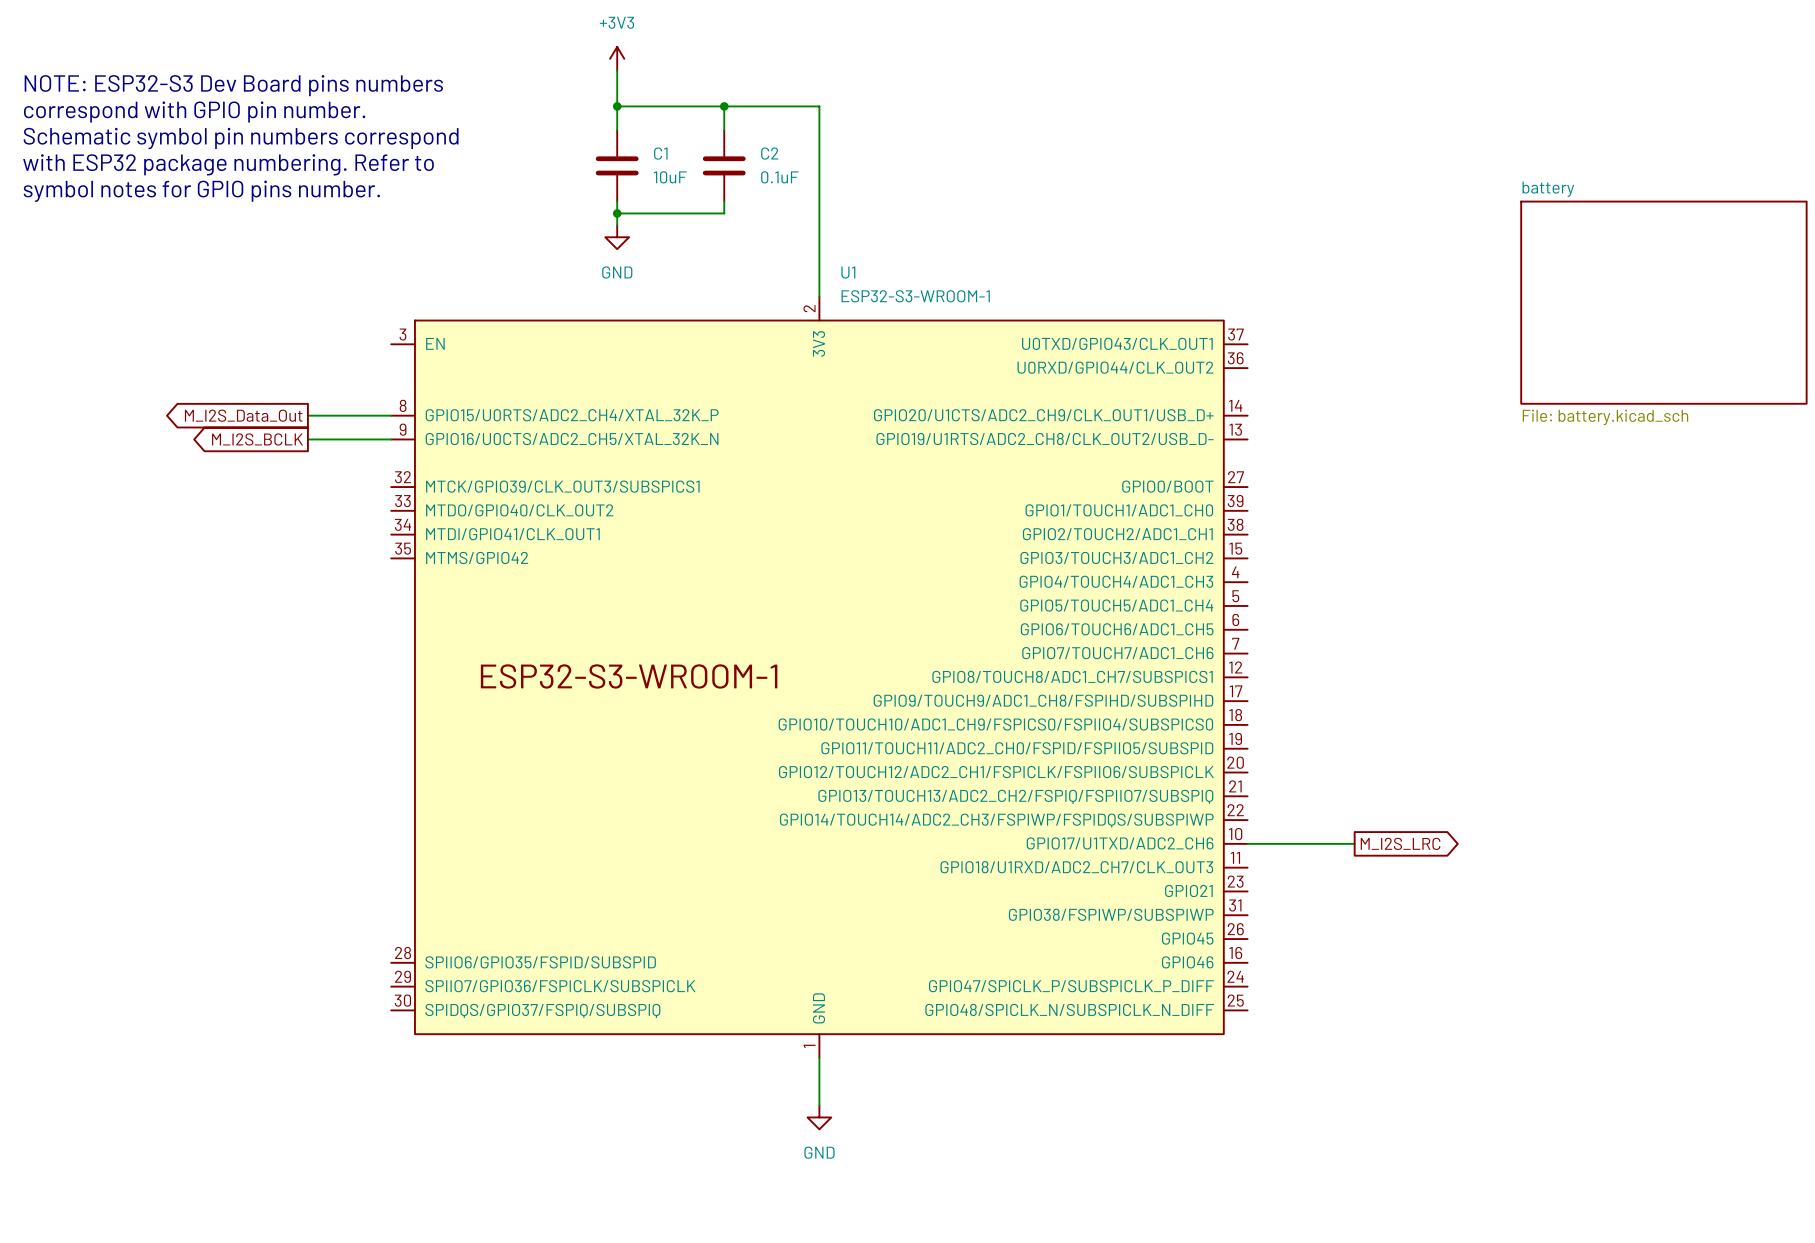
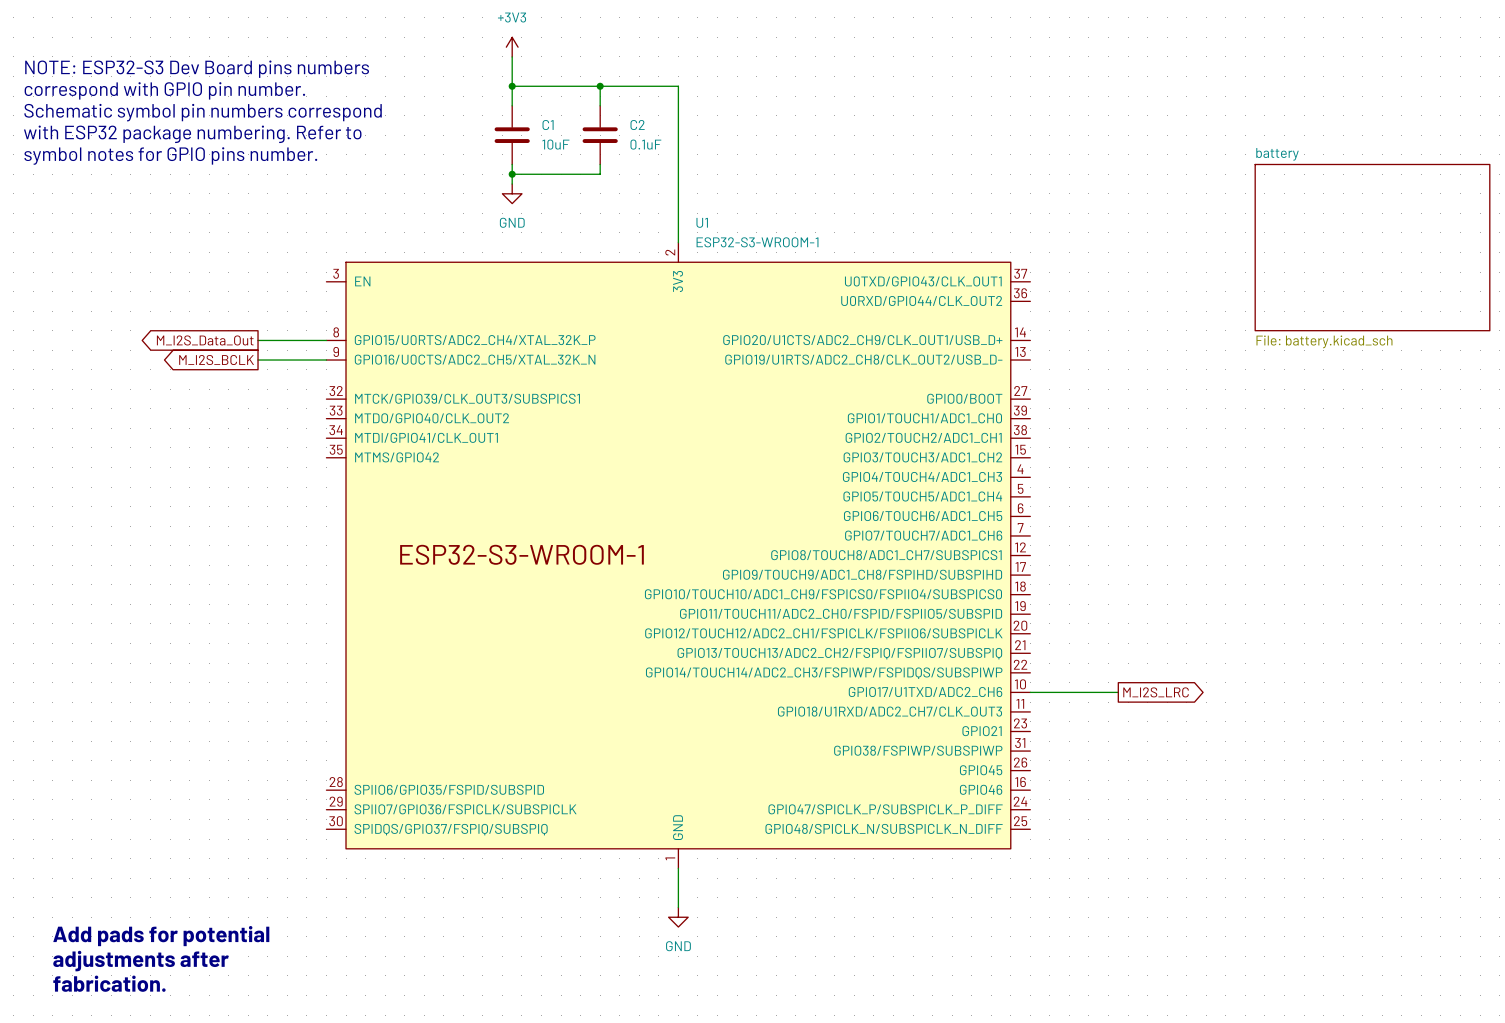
text: none -> Add pads for potential (161, 936)
text: none -> adjustments after (140, 961)
text: none -> fabrication. (109, 983)

